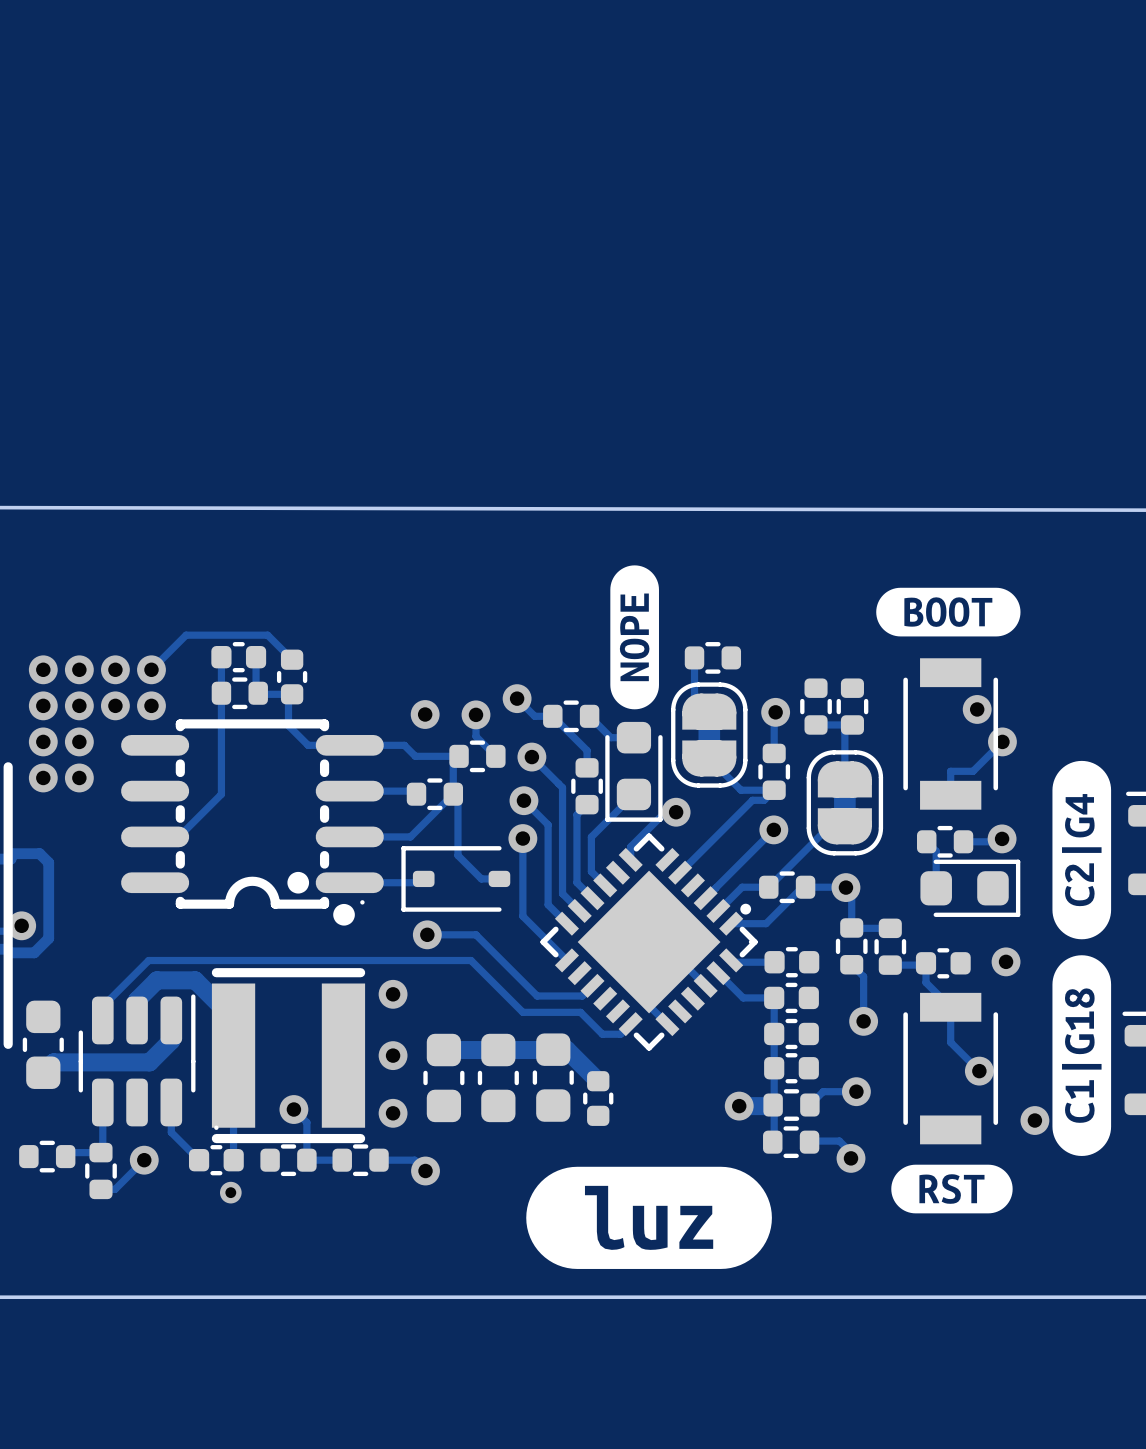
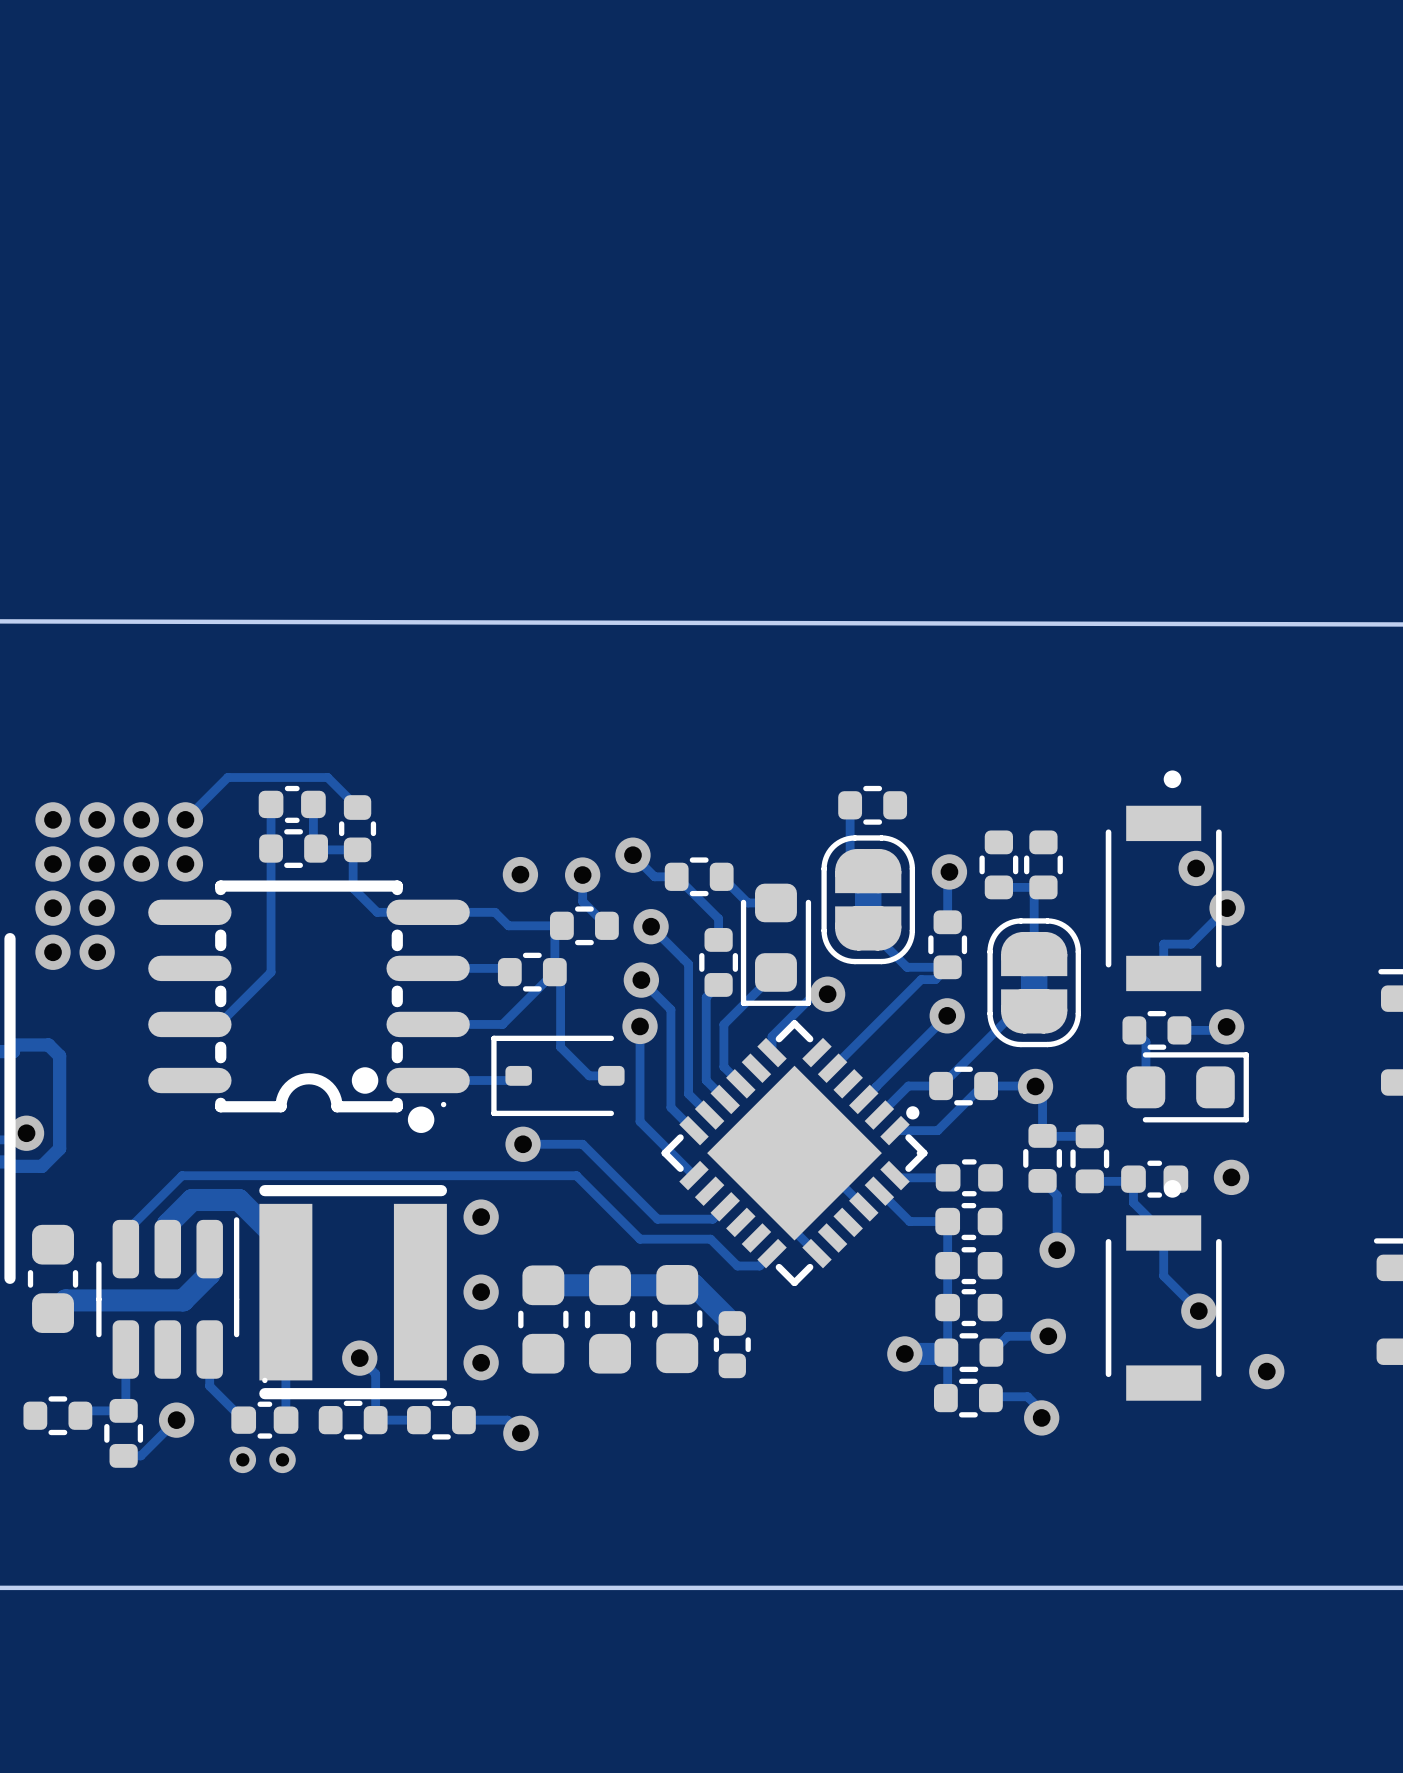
drawing: [610, 565, 659, 710] -> none
drawing: [876, 587, 1021, 637] -> none
part footprint: [903, 658, 999, 810] -> [1105, 770, 1222, 992]
drawing: [891, 760, 1112, 1214] -> none
part footprint: [903, 992, 999, 1145] -> [1105, 1180, 1222, 1401]
drawing: [526, 1166, 772, 1269] -> none
via: none -> (242, 1459)

